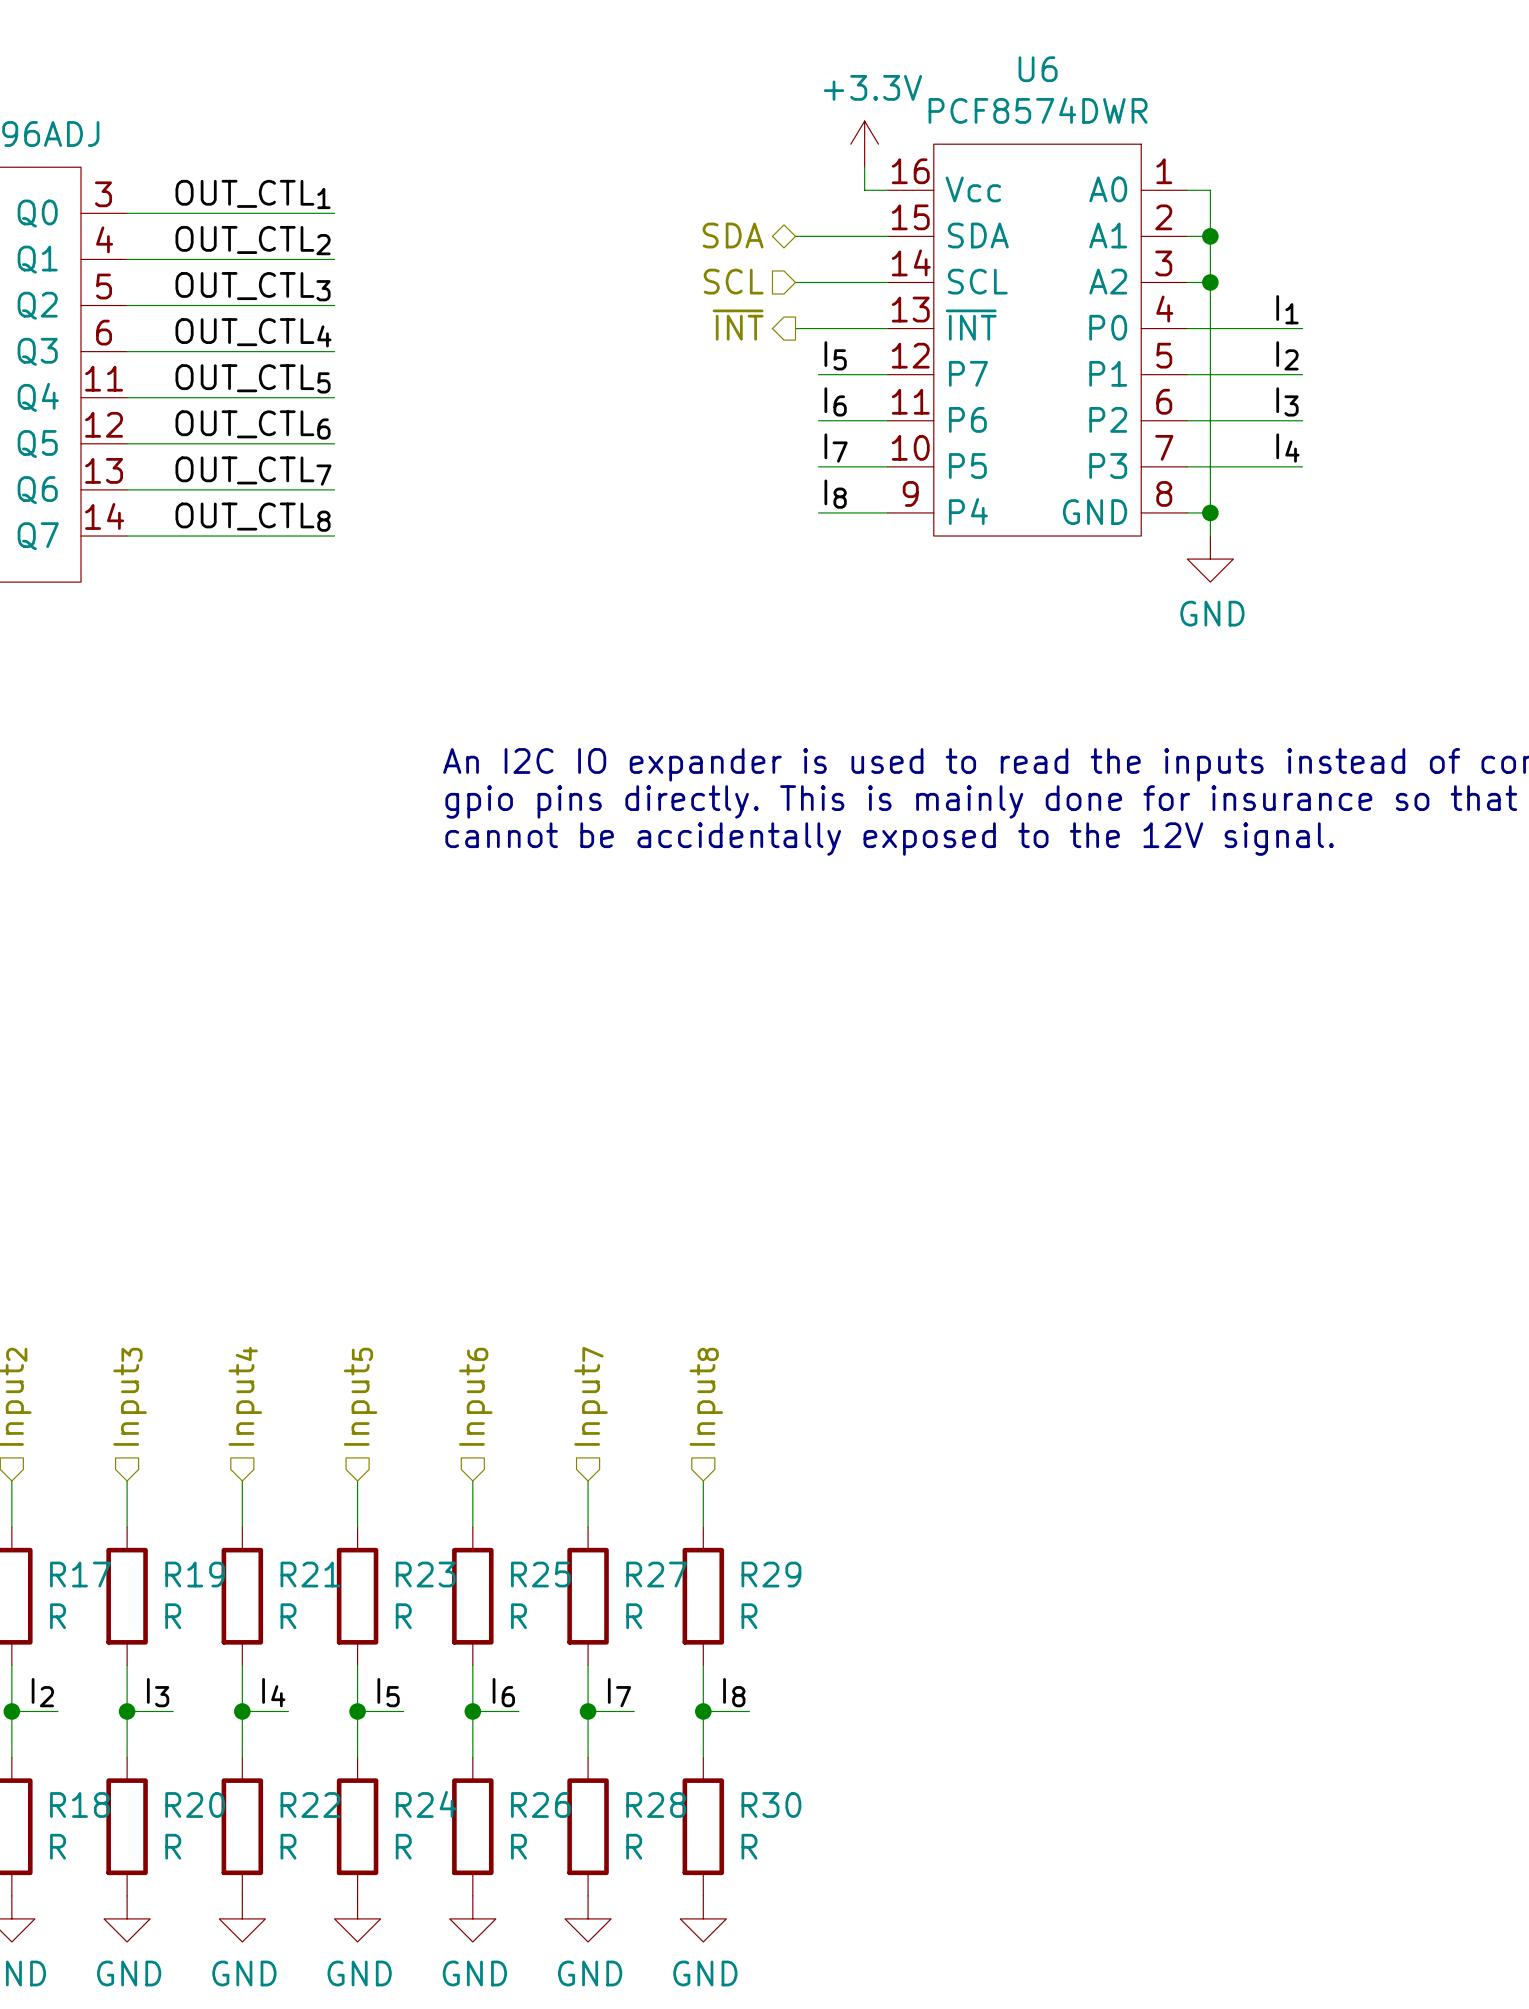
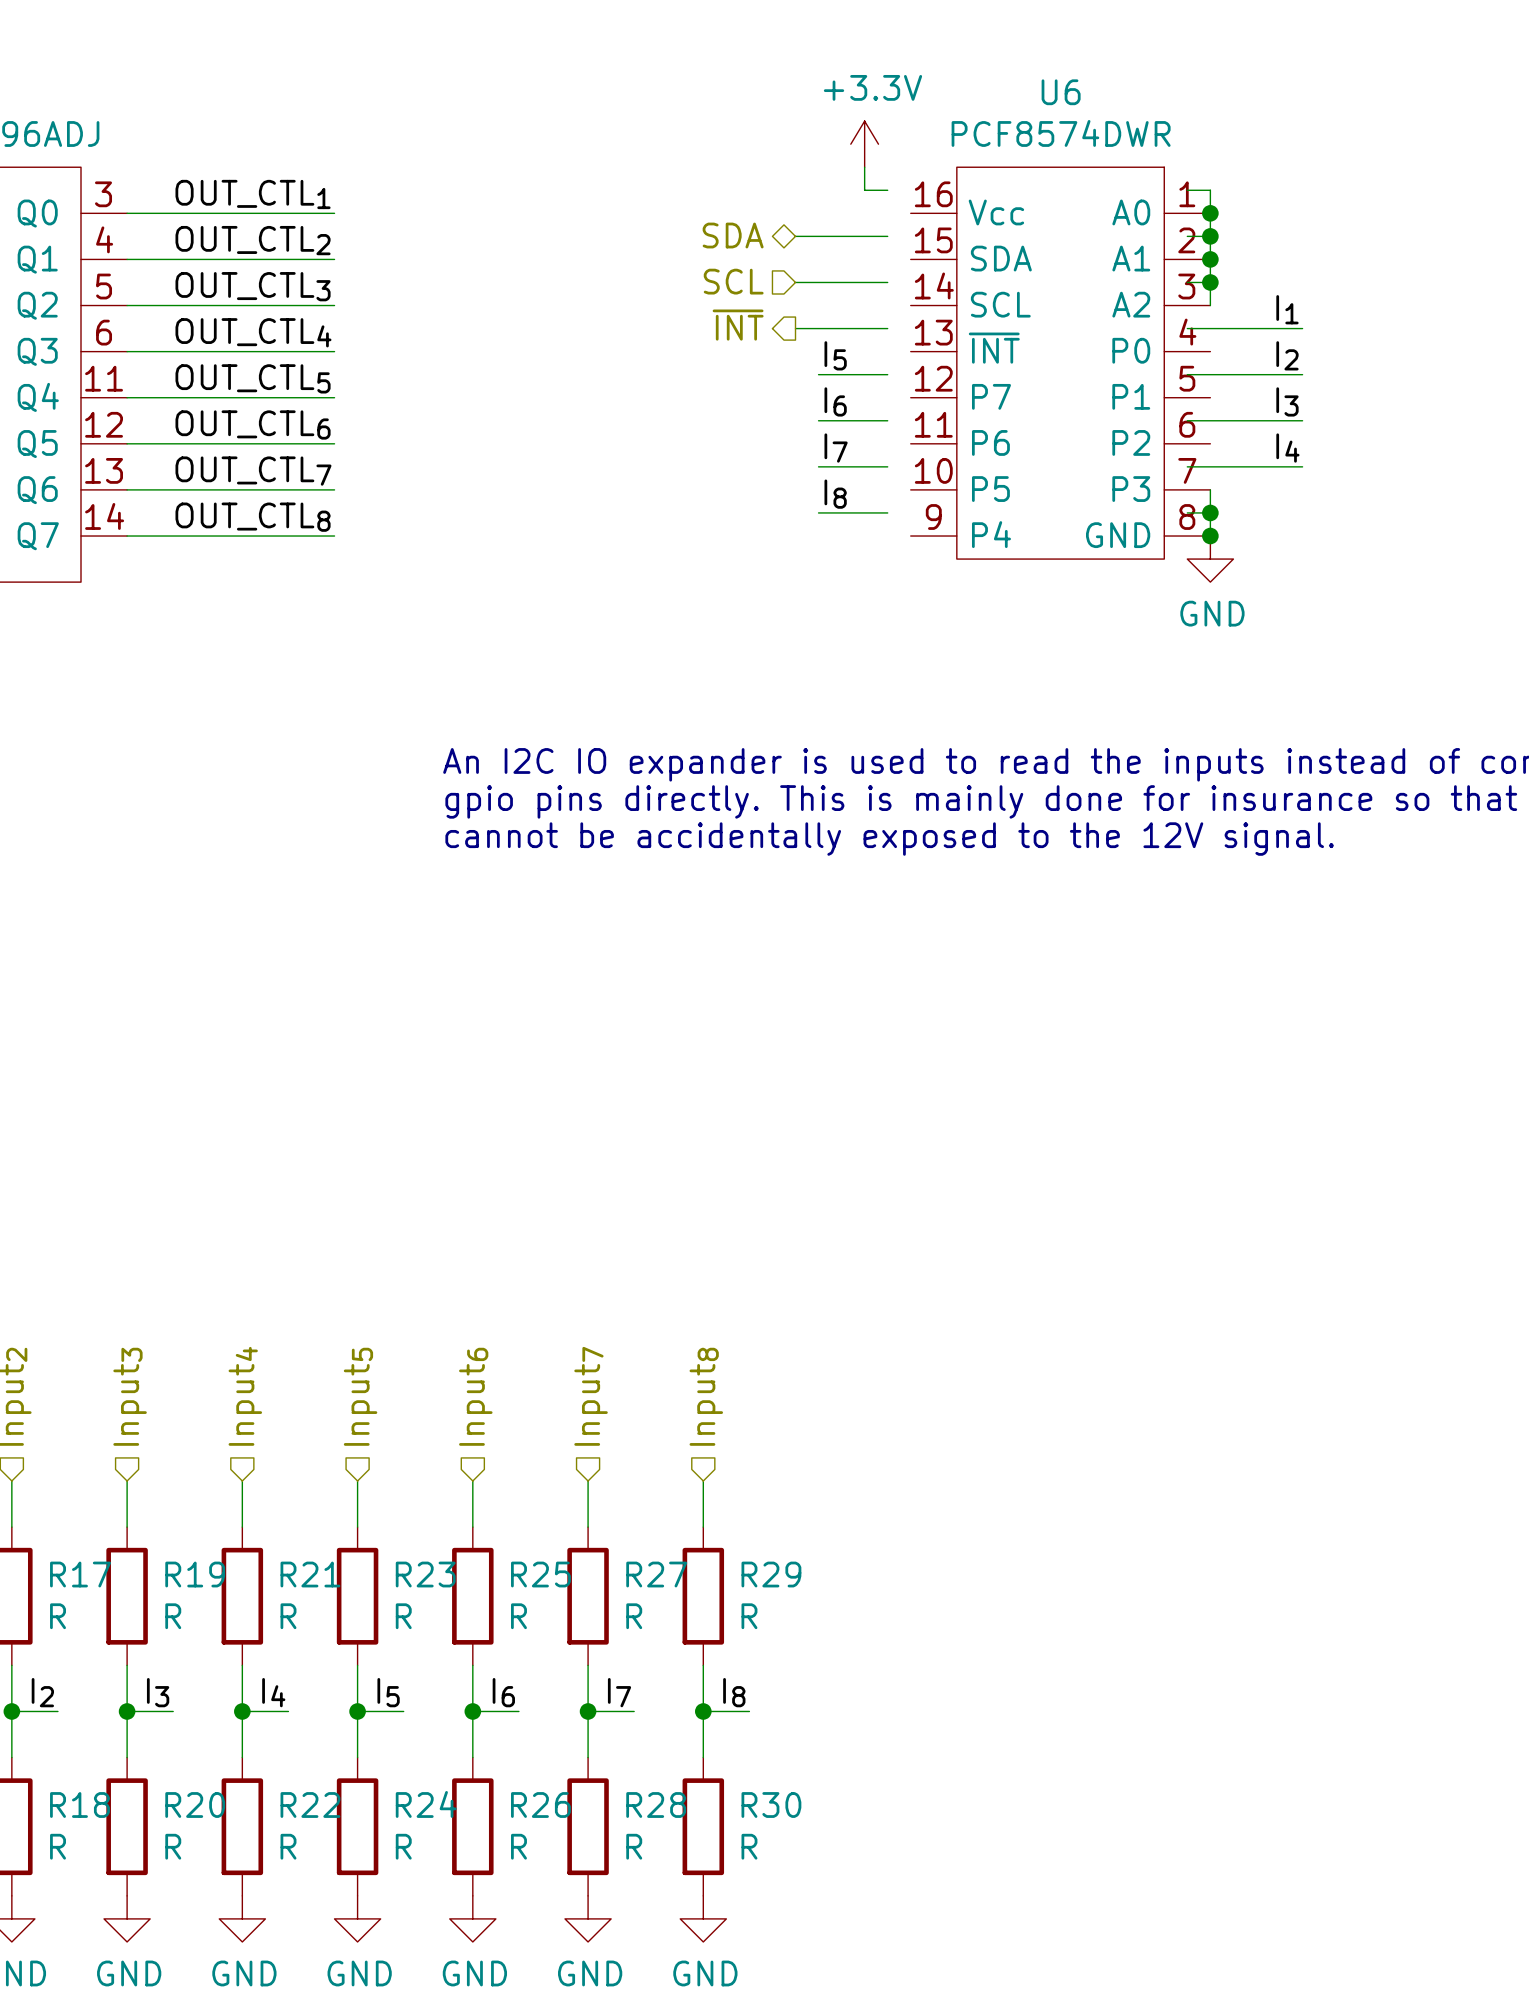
junction: none -> (1210, 213)
junction: none -> (1210, 259)
wire: (1210, 305) (1210, 489) -> none
U6 position: (1037, 340) -> (1060, 363)
junction: none -> (1210, 536)

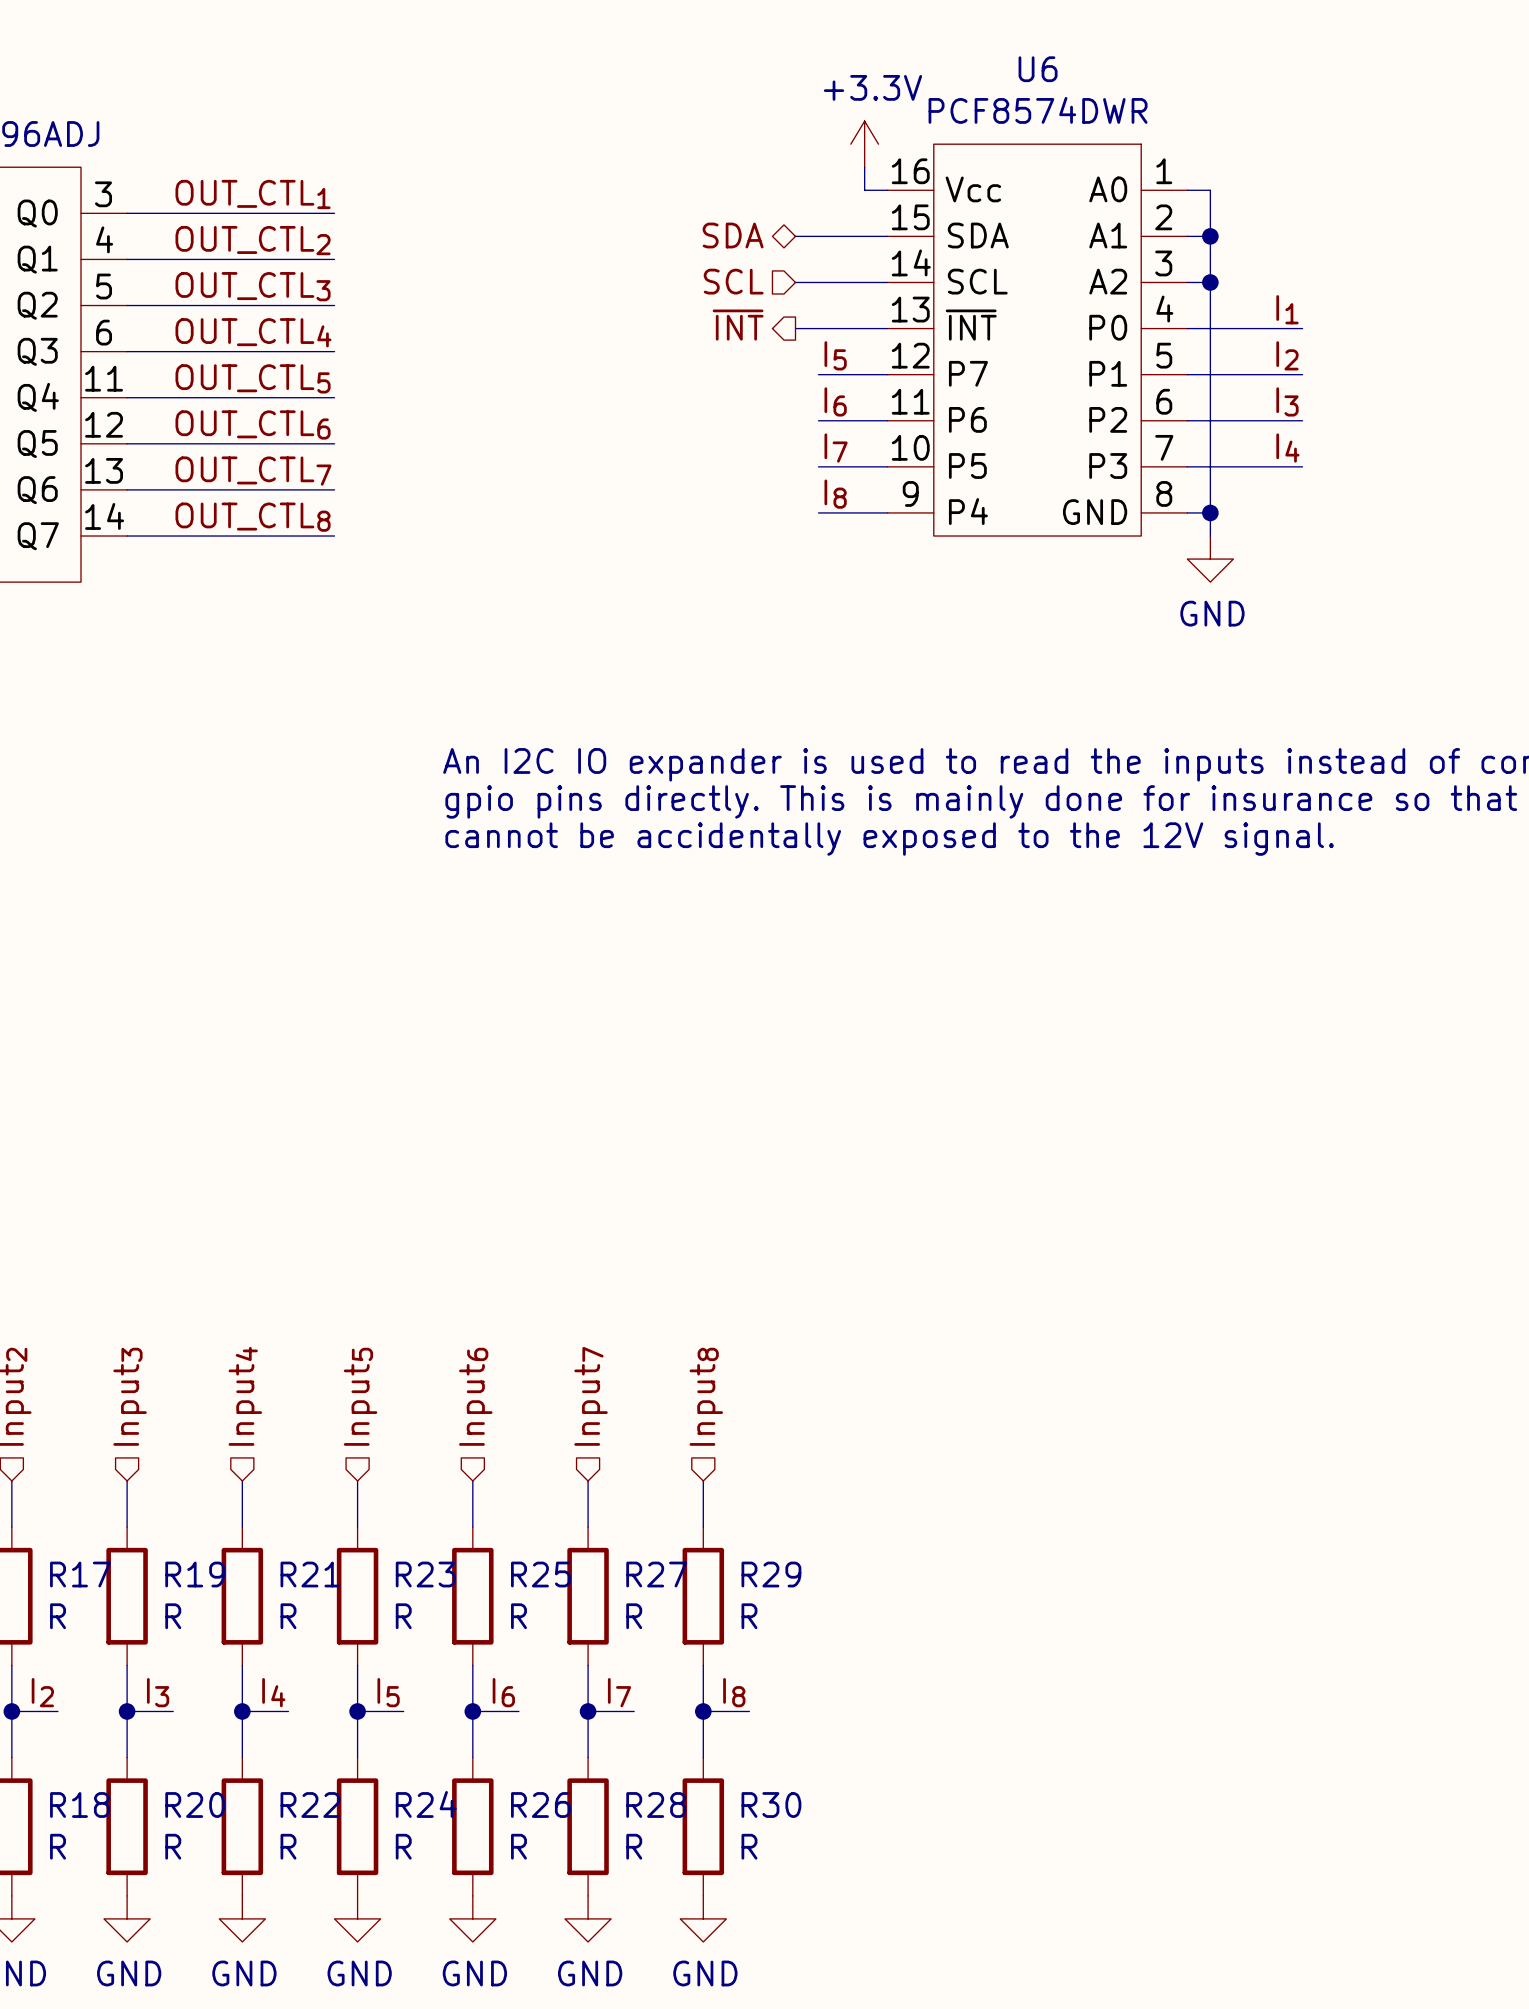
junction: (1210, 213) -> none
junction: (1210, 259) -> none
wire: none -> (1210, 305) (1210, 489)
U6 position: (1060, 363) -> (1037, 340)
junction: (1210, 536) -> none

